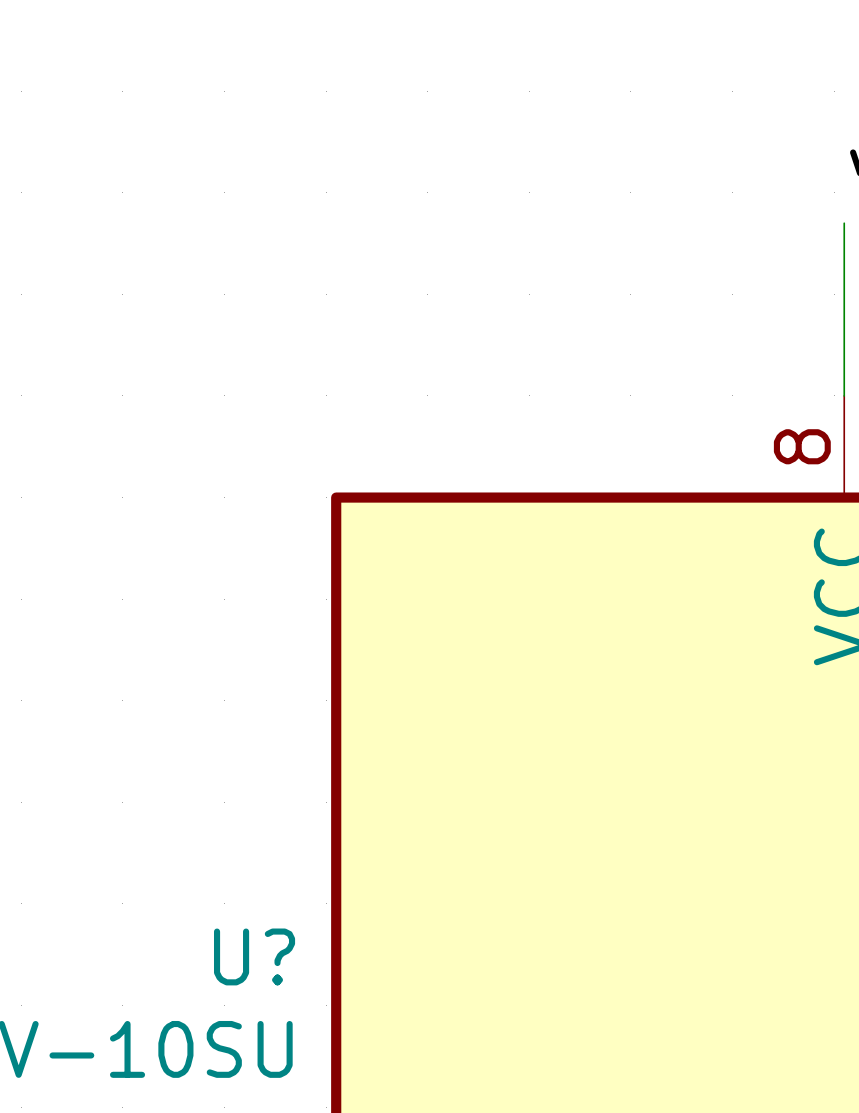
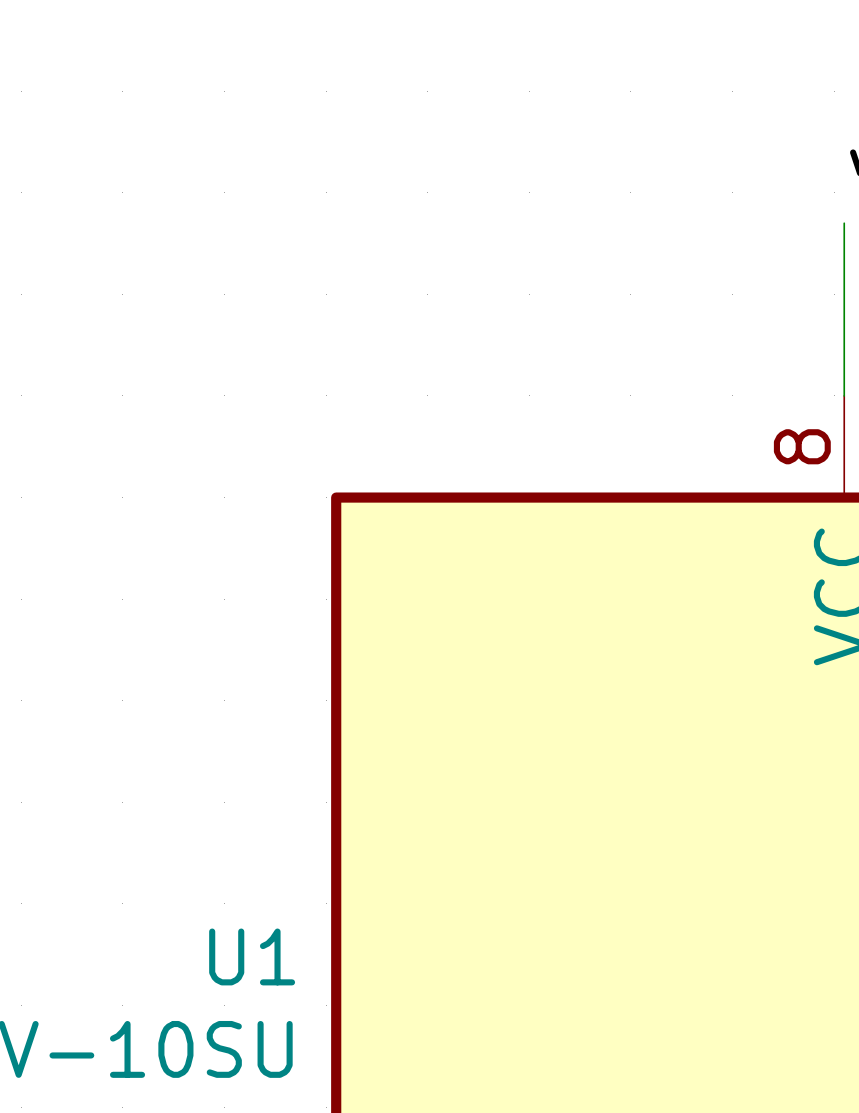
U? name: U? (254, 956) -> U1 (252, 956)

